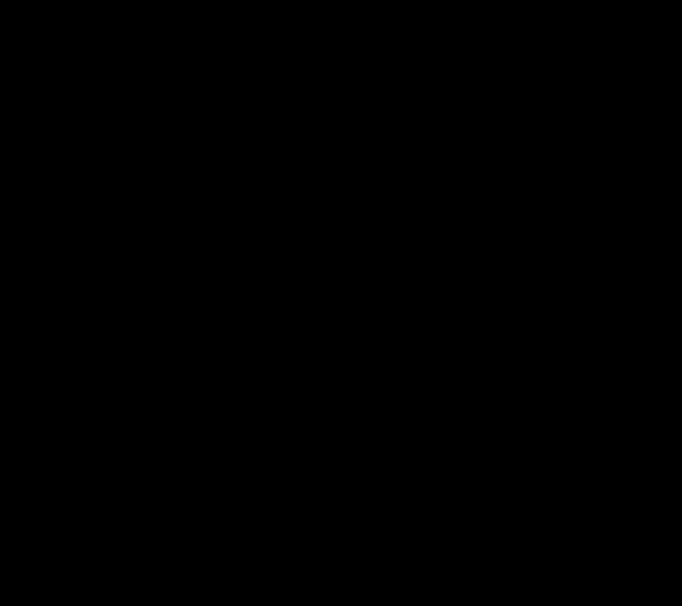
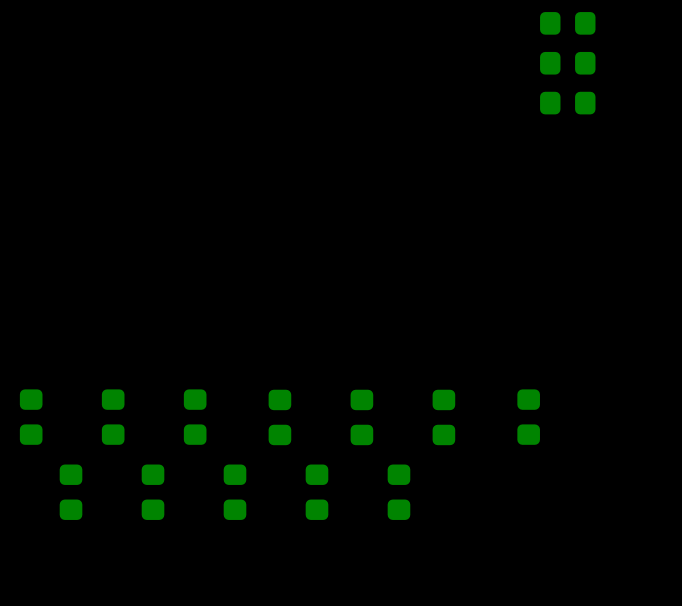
part: none -> (567, 23)
part: none -> (567, 63)
part: none -> (567, 103)
part: none -> (31, 417)
part: none -> (113, 417)
part: none -> (195, 417)
part: none -> (279, 417)
part: none -> (361, 417)
part: none -> (443, 417)
part: none -> (528, 417)
part: none -> (71, 492)
part: none -> (153, 492)
part: none -> (234, 492)
part: none -> (316, 492)
part: none -> (398, 492)

